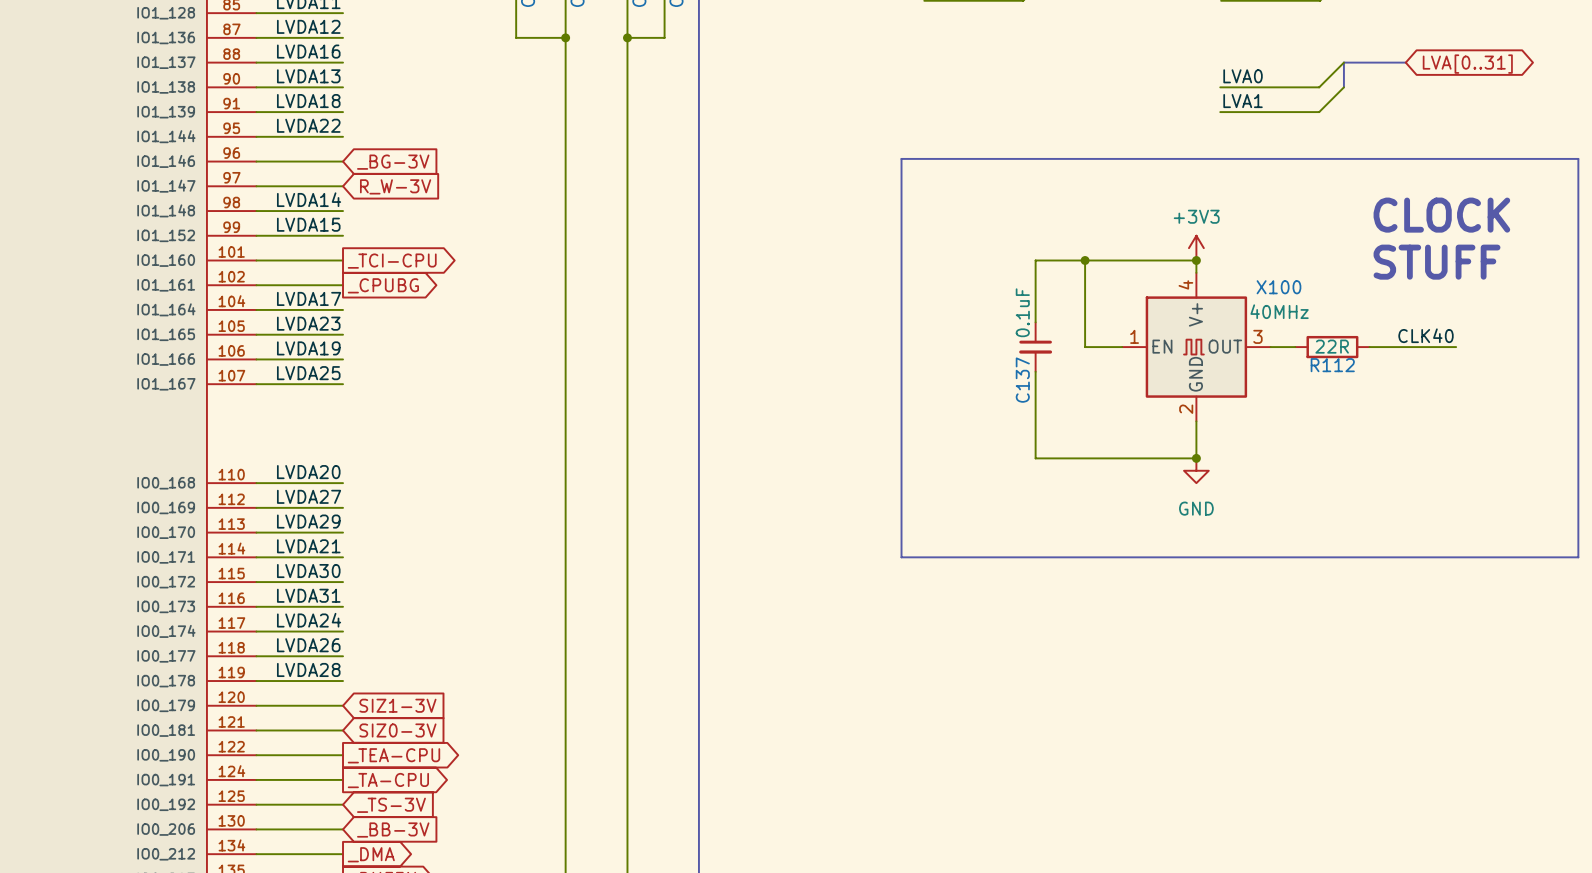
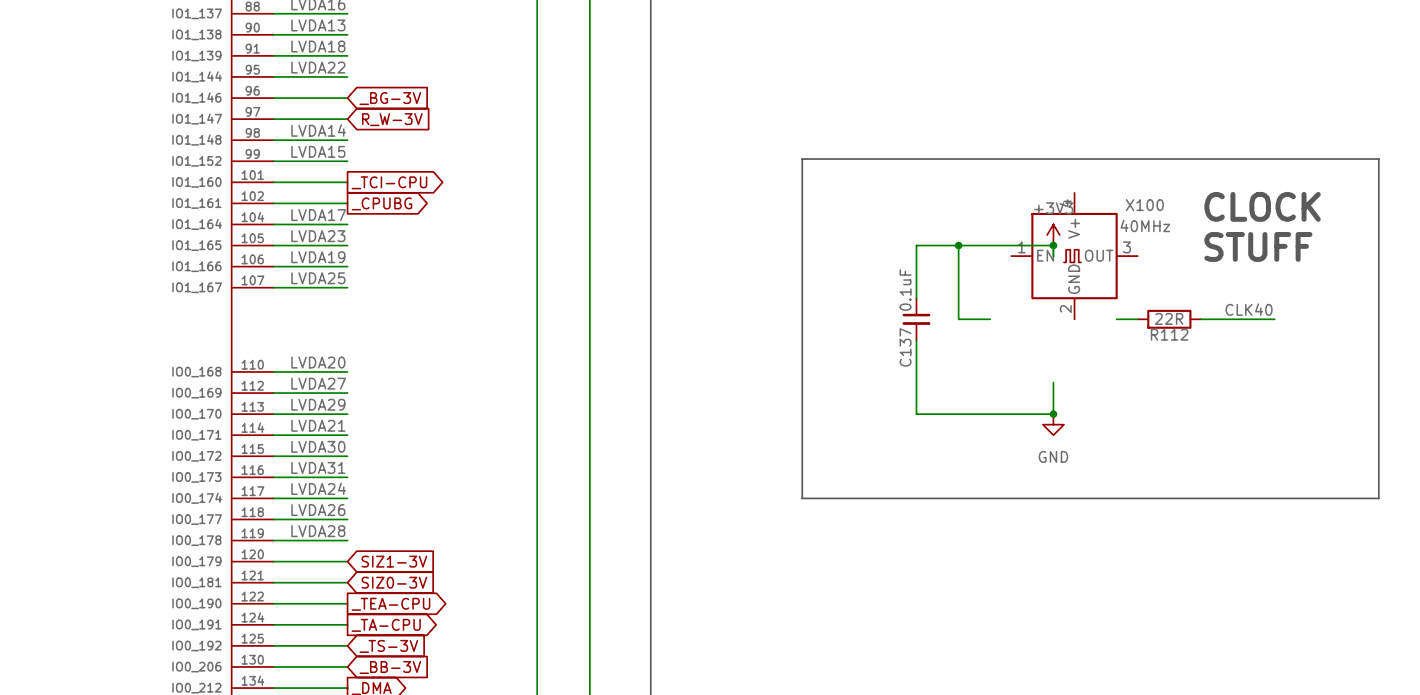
wire: (1343, 62) (1319, 87) (1220, 87) -> none
bus: (1405, 62) (1343, 62) (1343, 87) -> none
global label: LVA[0..31] (1467, 64) -> none
label: LVA0 (1243, 76) -> none
wire: (1343, 87) (1319, 112) (1220, 112) -> none
label: LVA1 (1243, 101) -> none
line: (901, 158) (1578, 158) (1578, 557) (901, 557) (901, 158) -> (802, 159) (1378, 159) (1378, 498) (802, 498) (802, 159)
text position: CLOCK (1441, 215) -> CLOCK (1262, 206)
power symbol position: +3V3 (1196, 248) -> +3V3 (1053, 235)
wire: (1085, 260) (1085, 347) (1122, 347) -> (958, 245) (958, 319) (990, 319)
junction: (1085, 260) -> none
junction: (1196, 260) -> none
text position: STUFF (1437, 262) -> STUFF (1258, 246)
wire: (1196, 272) (1196, 260) (1035, 260) (1035, 322) -> (1053, 256) (1053, 245) (916, 245) (916, 298)
junction: none -> (958, 245)
junction: none -> (1053, 245)
label position: CLK40 (1426, 335) -> CLK40 (1249, 309)
C137 position: (1035, 347) -> (916, 319)
wire: (1270, 347) (1295, 347) -> (1116, 319) (1137, 319)
R112 position: (1332, 347) -> (1169, 319)
wire: (1369, 347) (1456, 347) -> (1200, 319) (1274, 319)
wire: (1035, 371) (1035, 458) (1196, 458) (1196, 421) -> (916, 340) (916, 414) (1053, 414) (1053, 382)
junction: (1196, 458) -> none
power symbol position: GND (1196, 470) -> GND (1053, 424)
junction: none -> (1053, 414)

